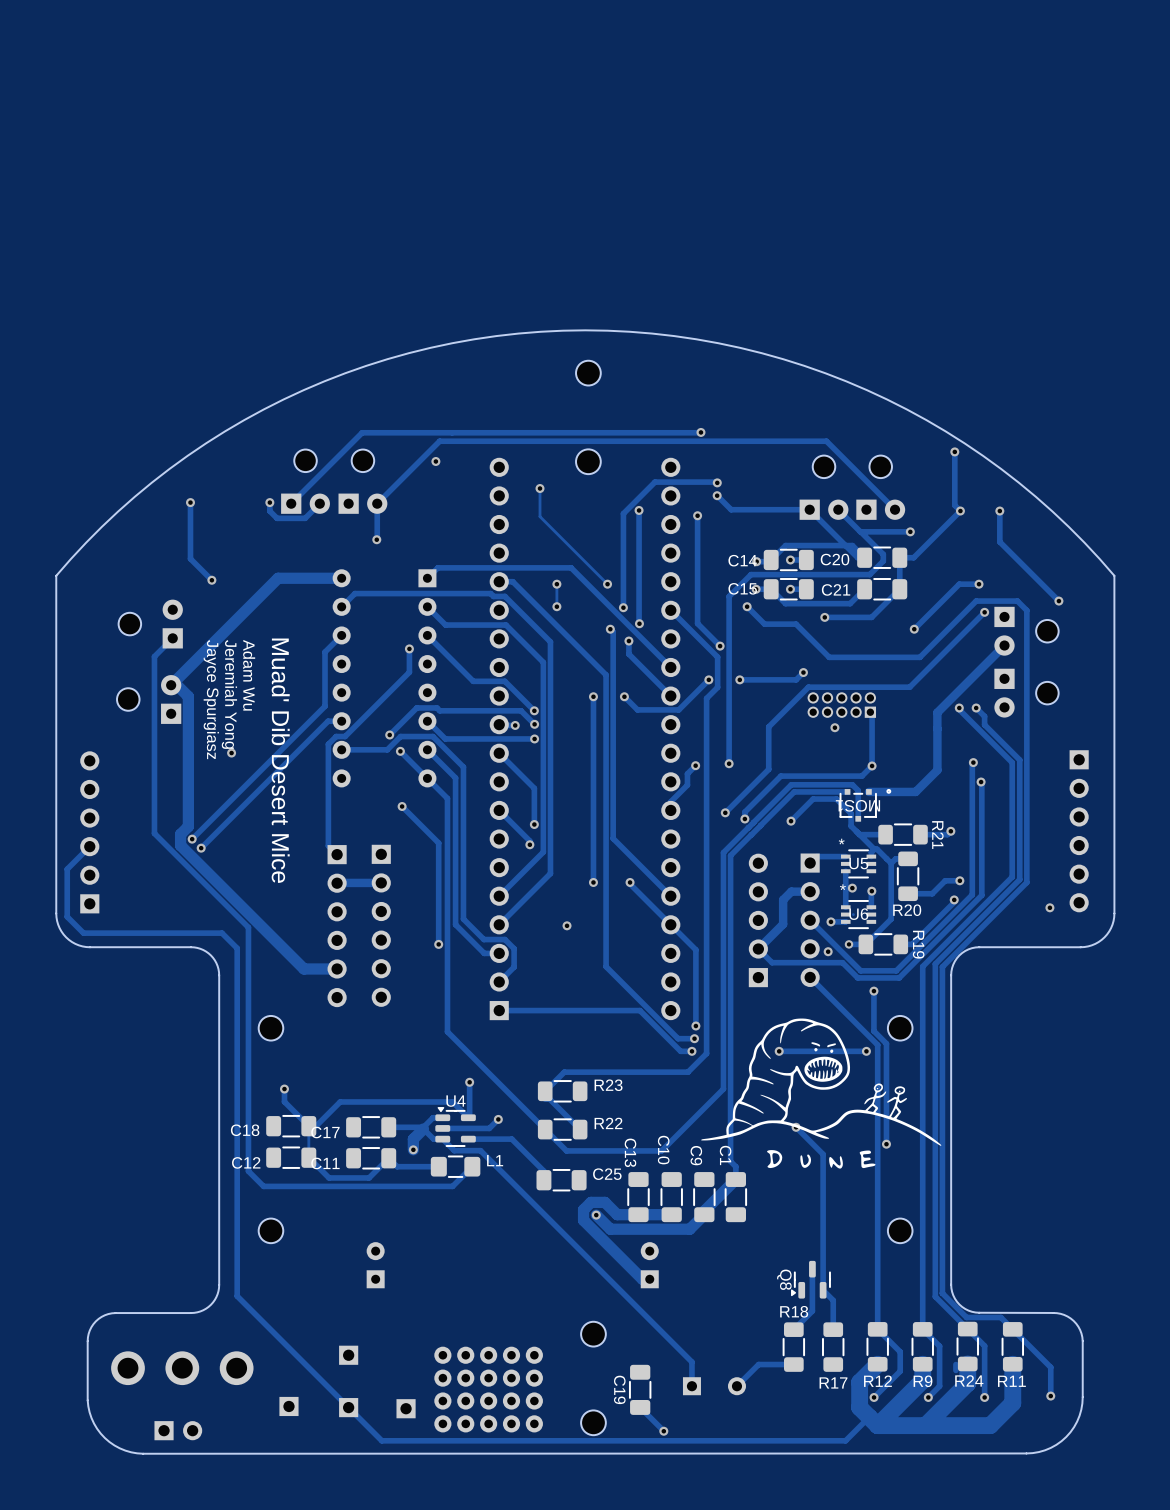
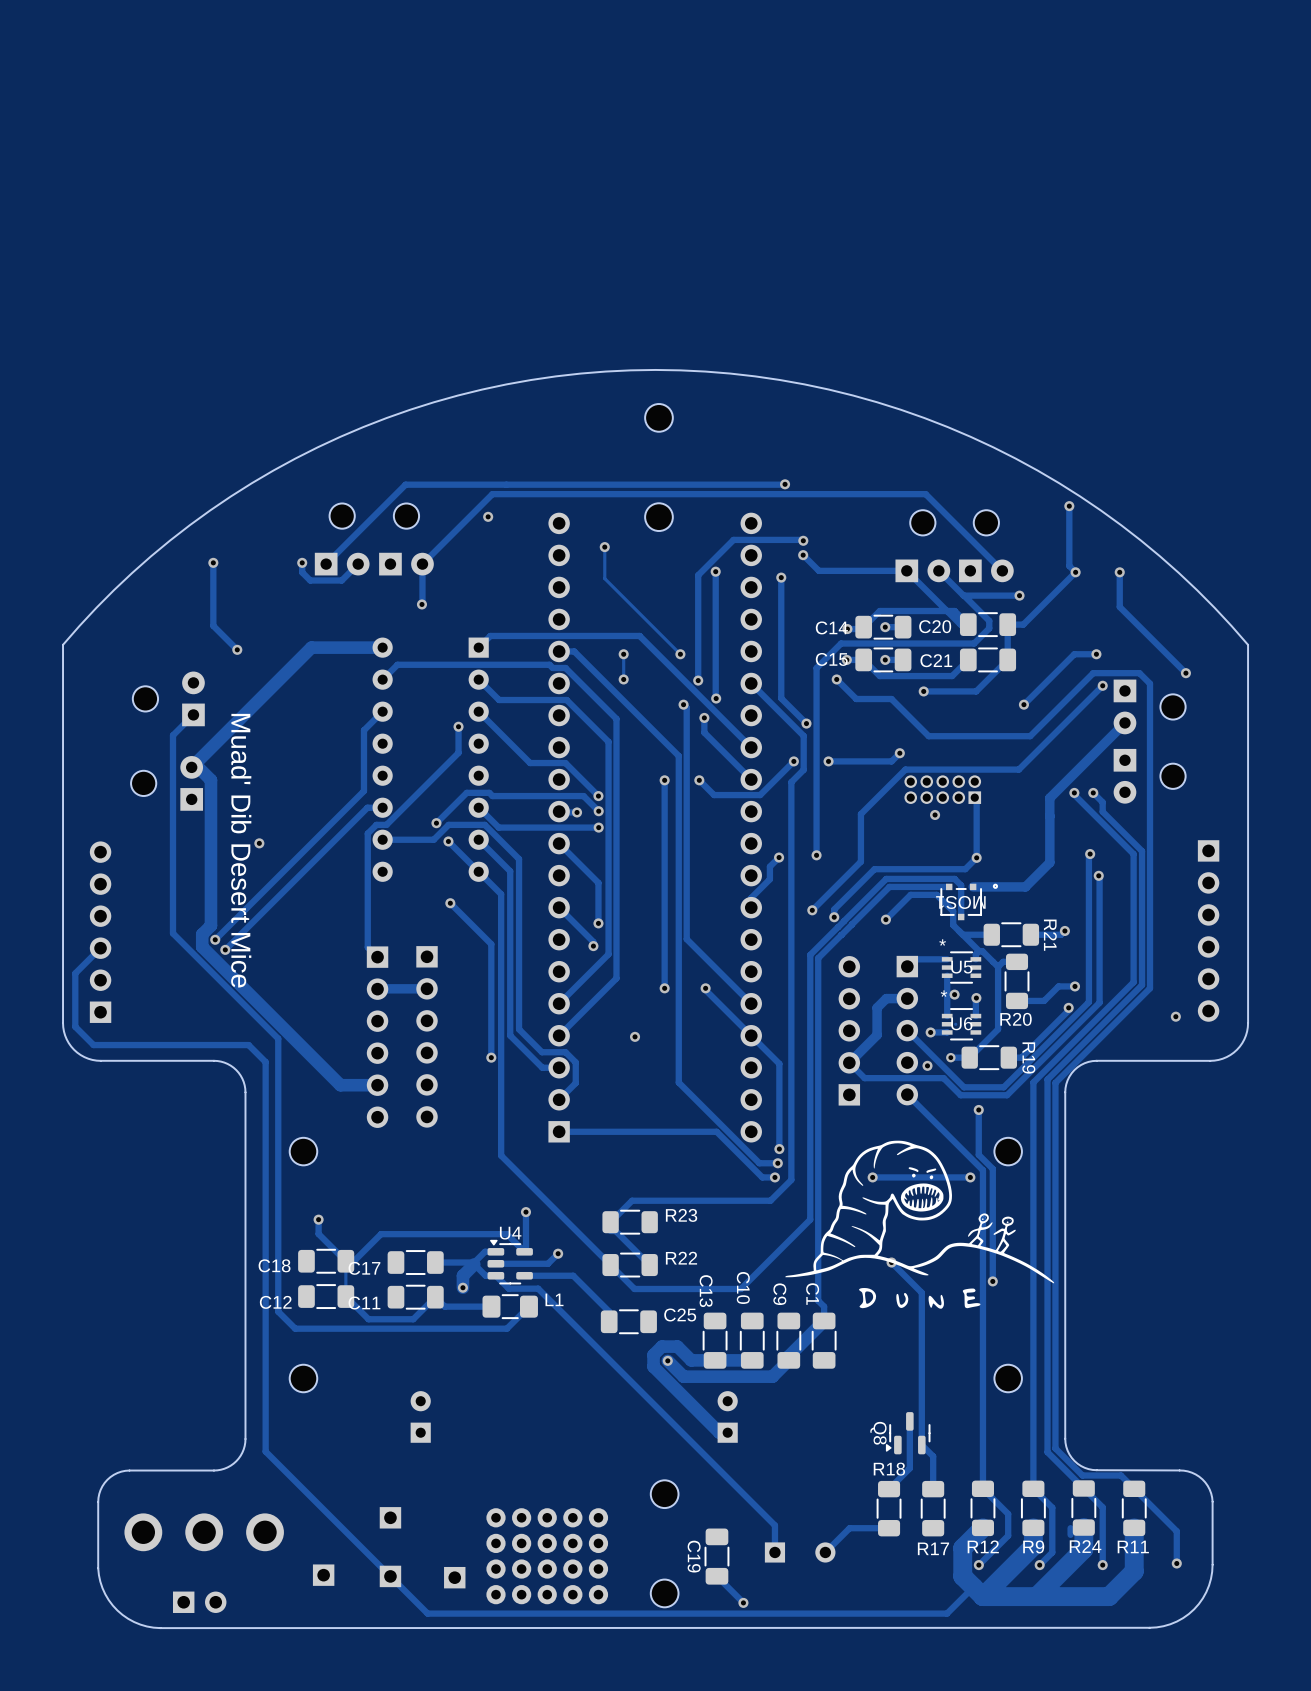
text: Adam Wu (249, 675) -> none
text: Jeremiah Yong (229, 694) -> none
text: Jayce Spurgiasz (211, 699) -> Muad' Dib Desert Mice (241, 850)
text: Muad' Dib Desert Mice (280, 760) -> none

